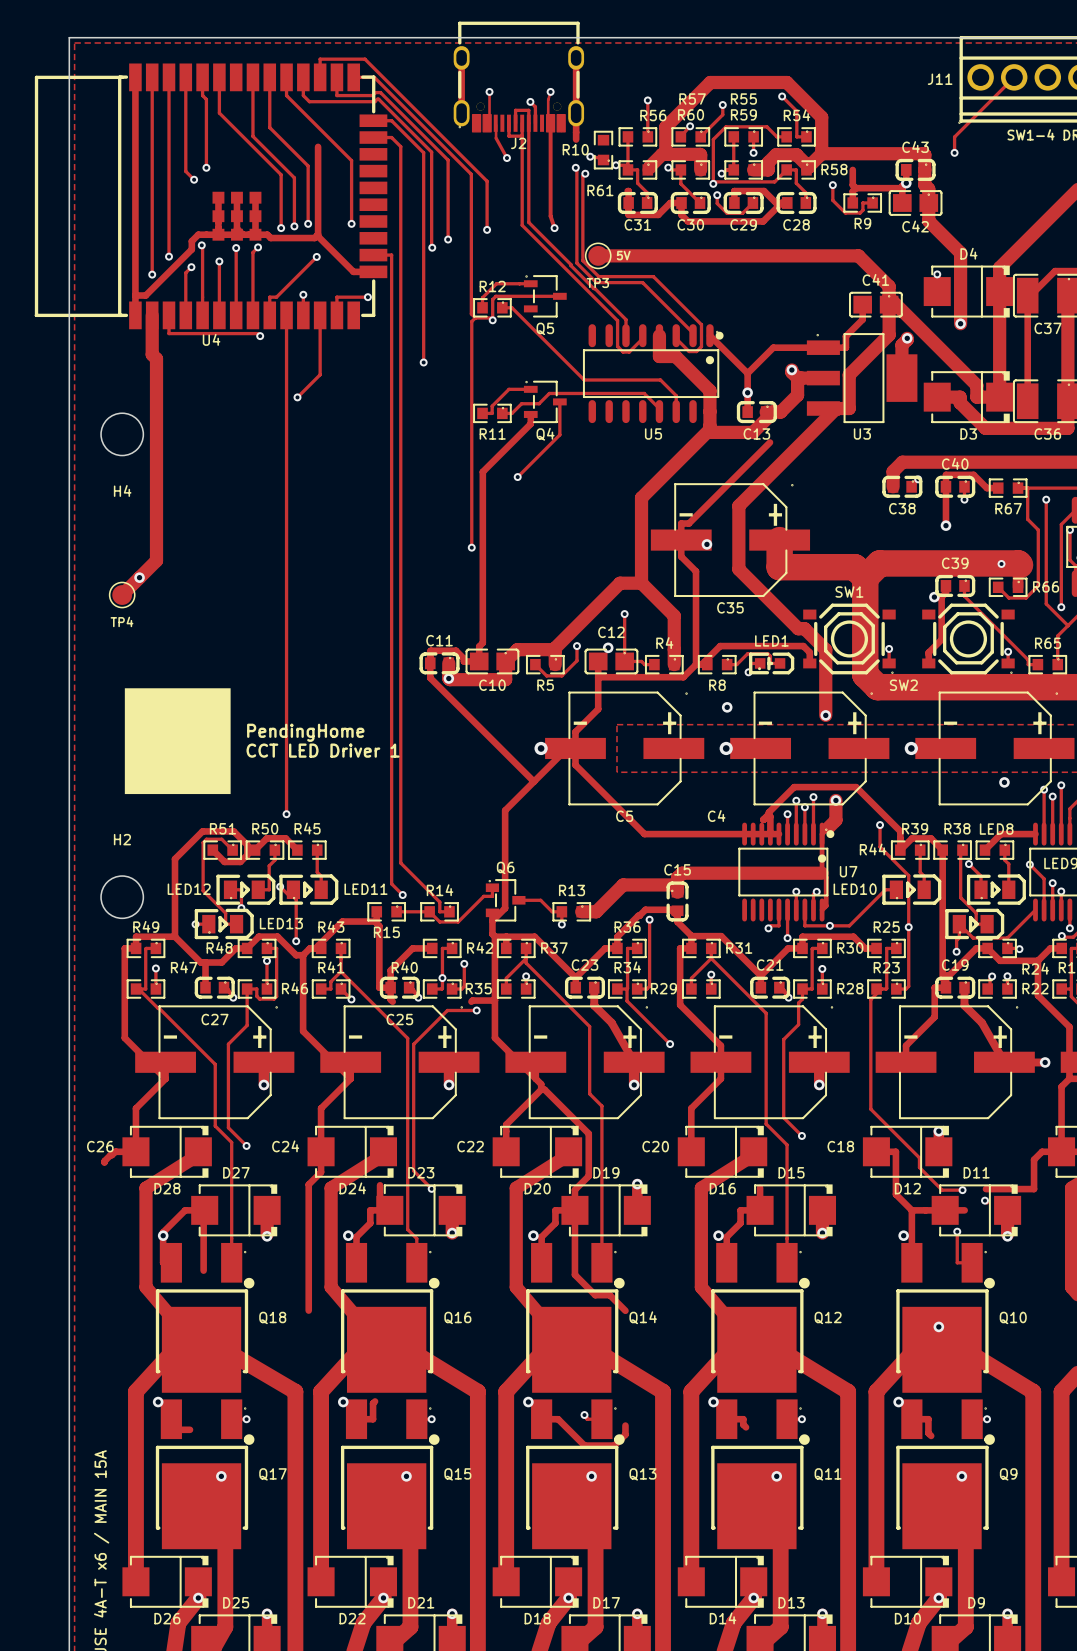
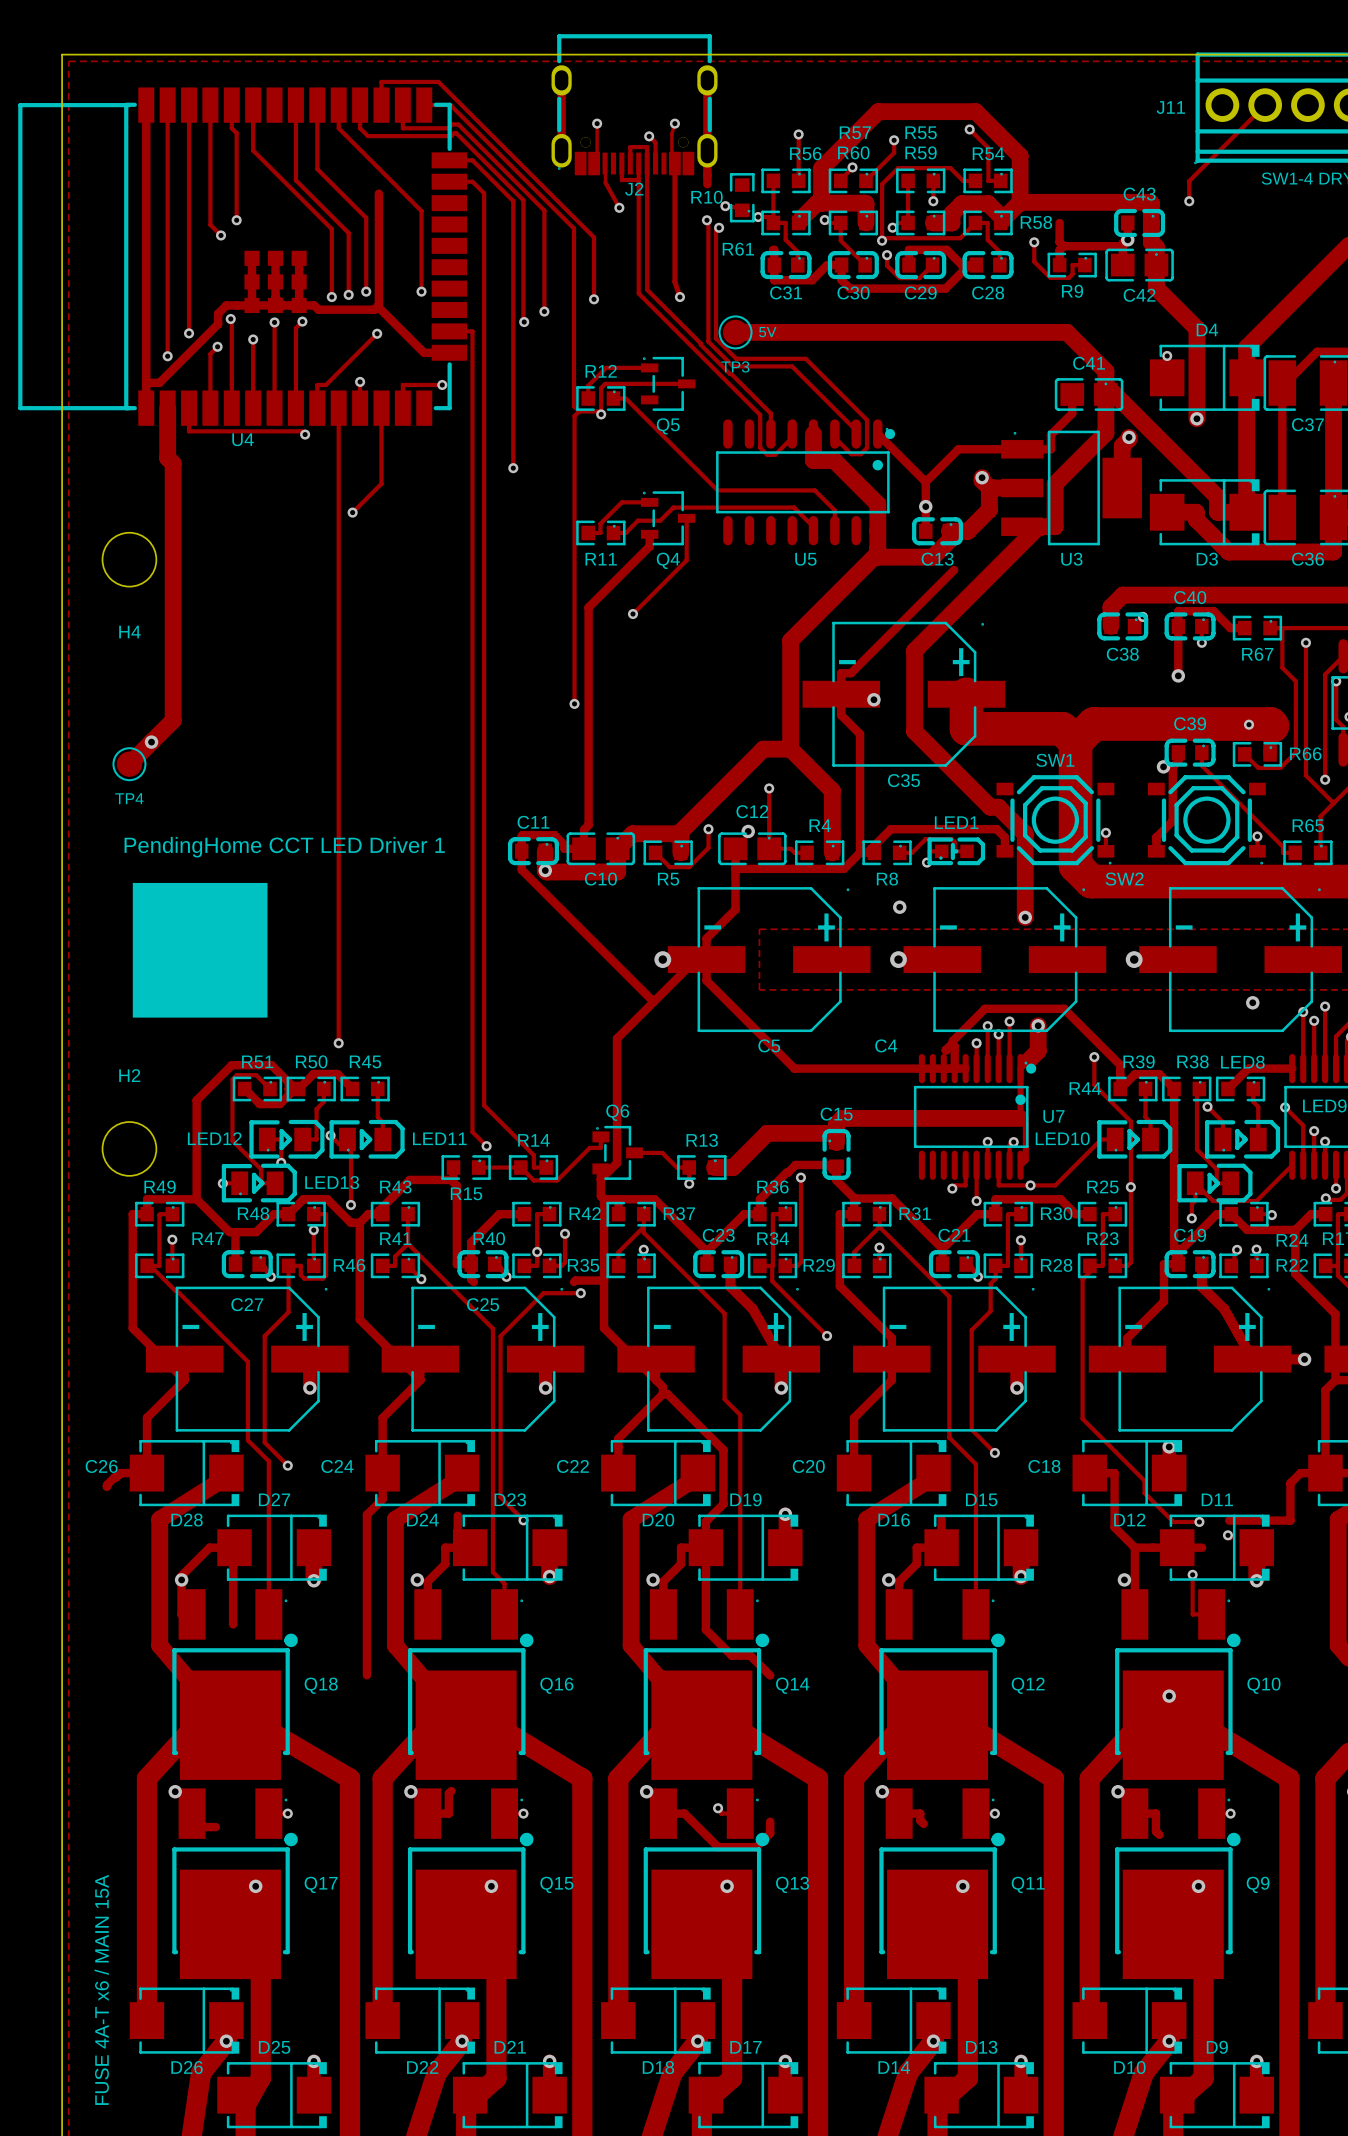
text: none -> PendingHome CCT LED Driver 1 (284, 847)
text: PendingHome (305, 732) -> none
text: CCT LED Driver 1 (323, 750) -> none

